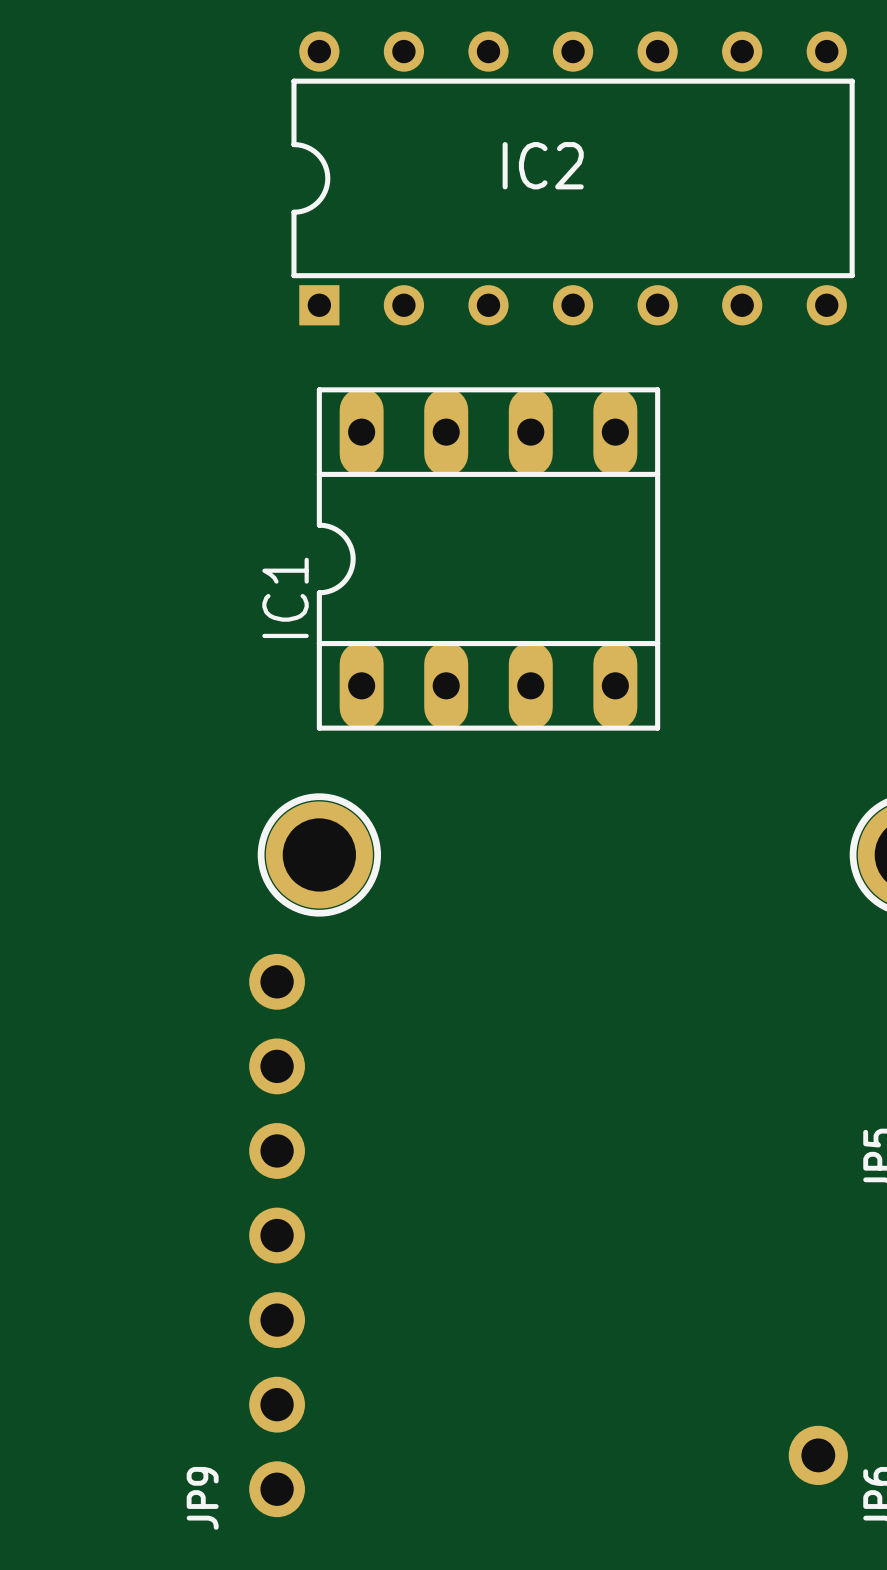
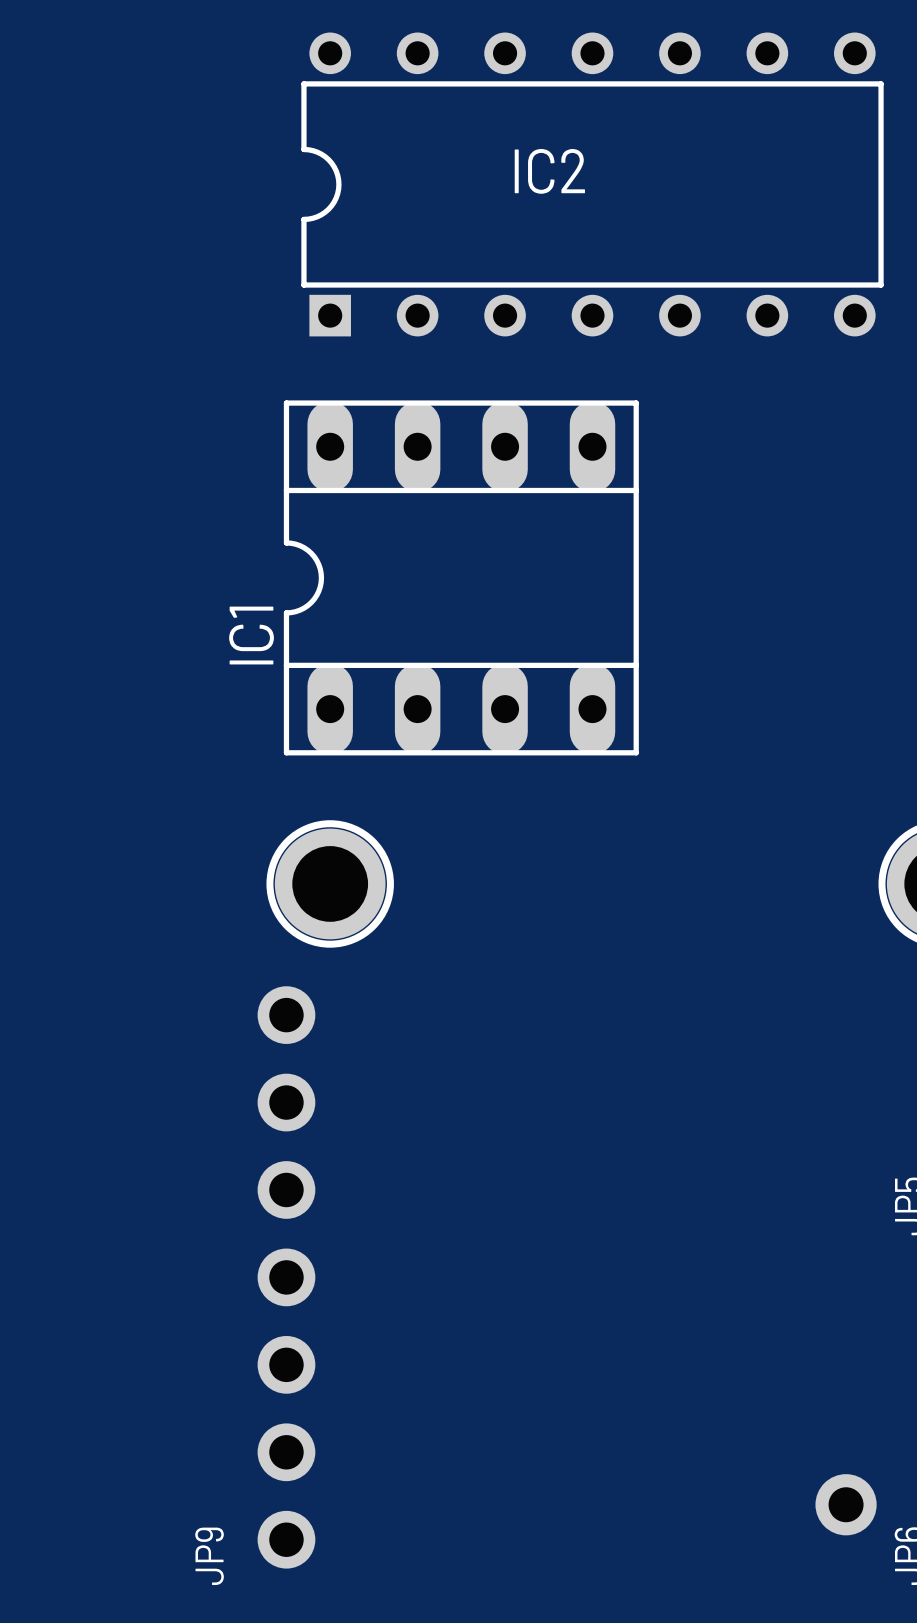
IC1 position: (488, 558) -> (461, 577)

